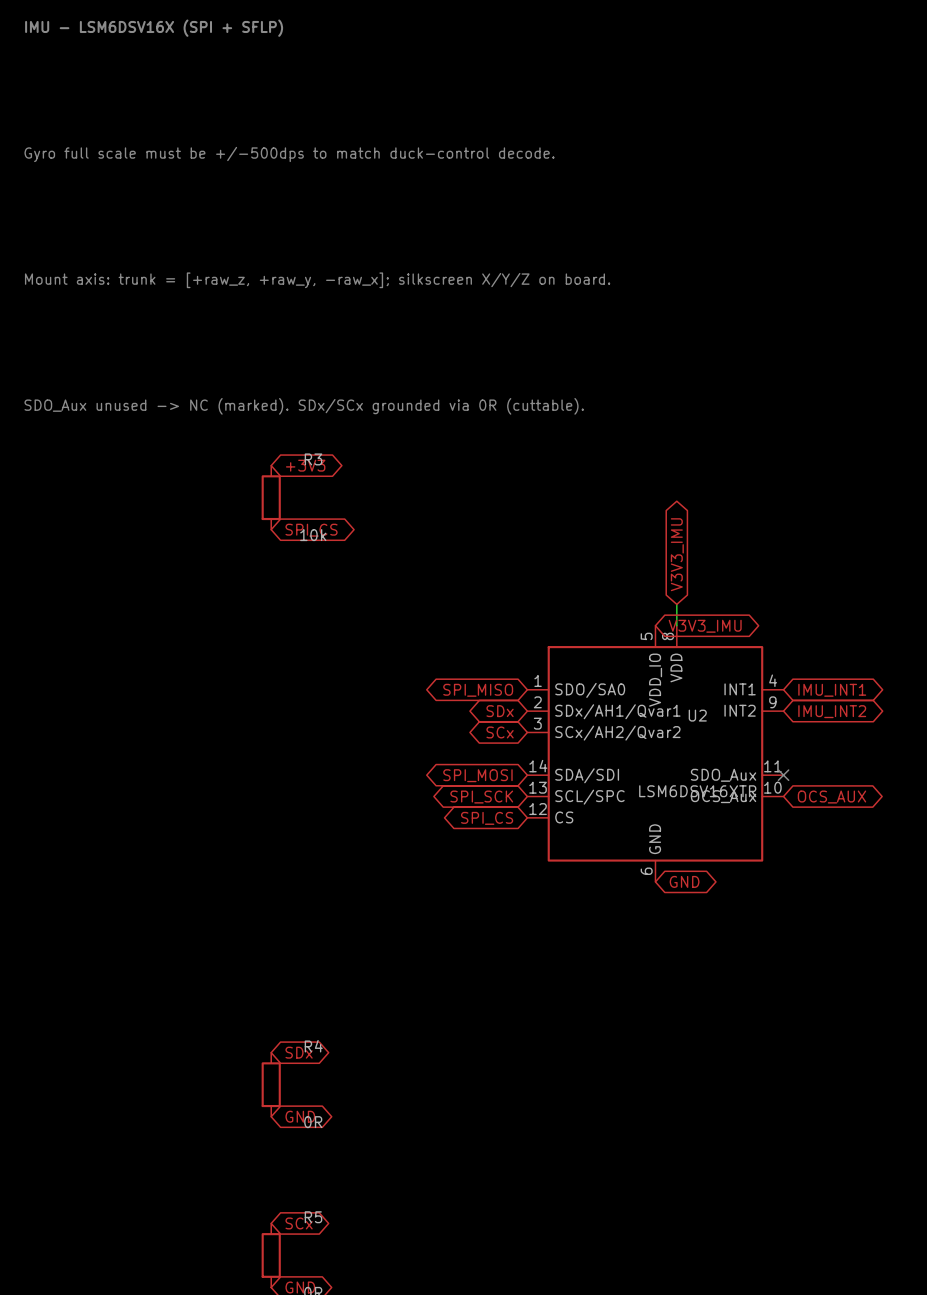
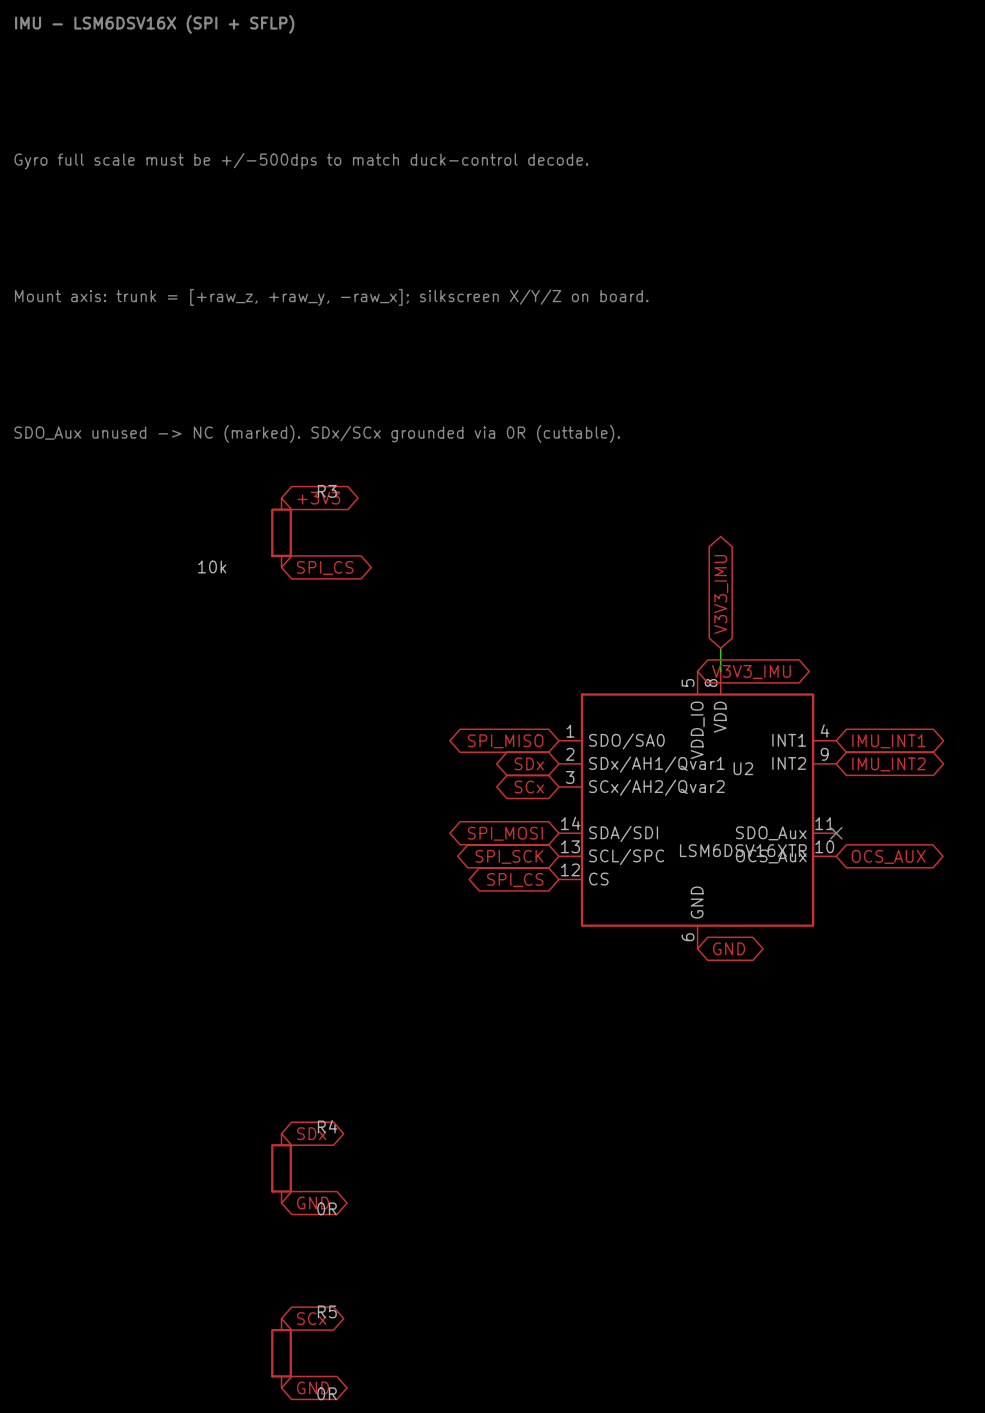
R3 value position: 10k (313, 535) -> 10k (212, 566)

